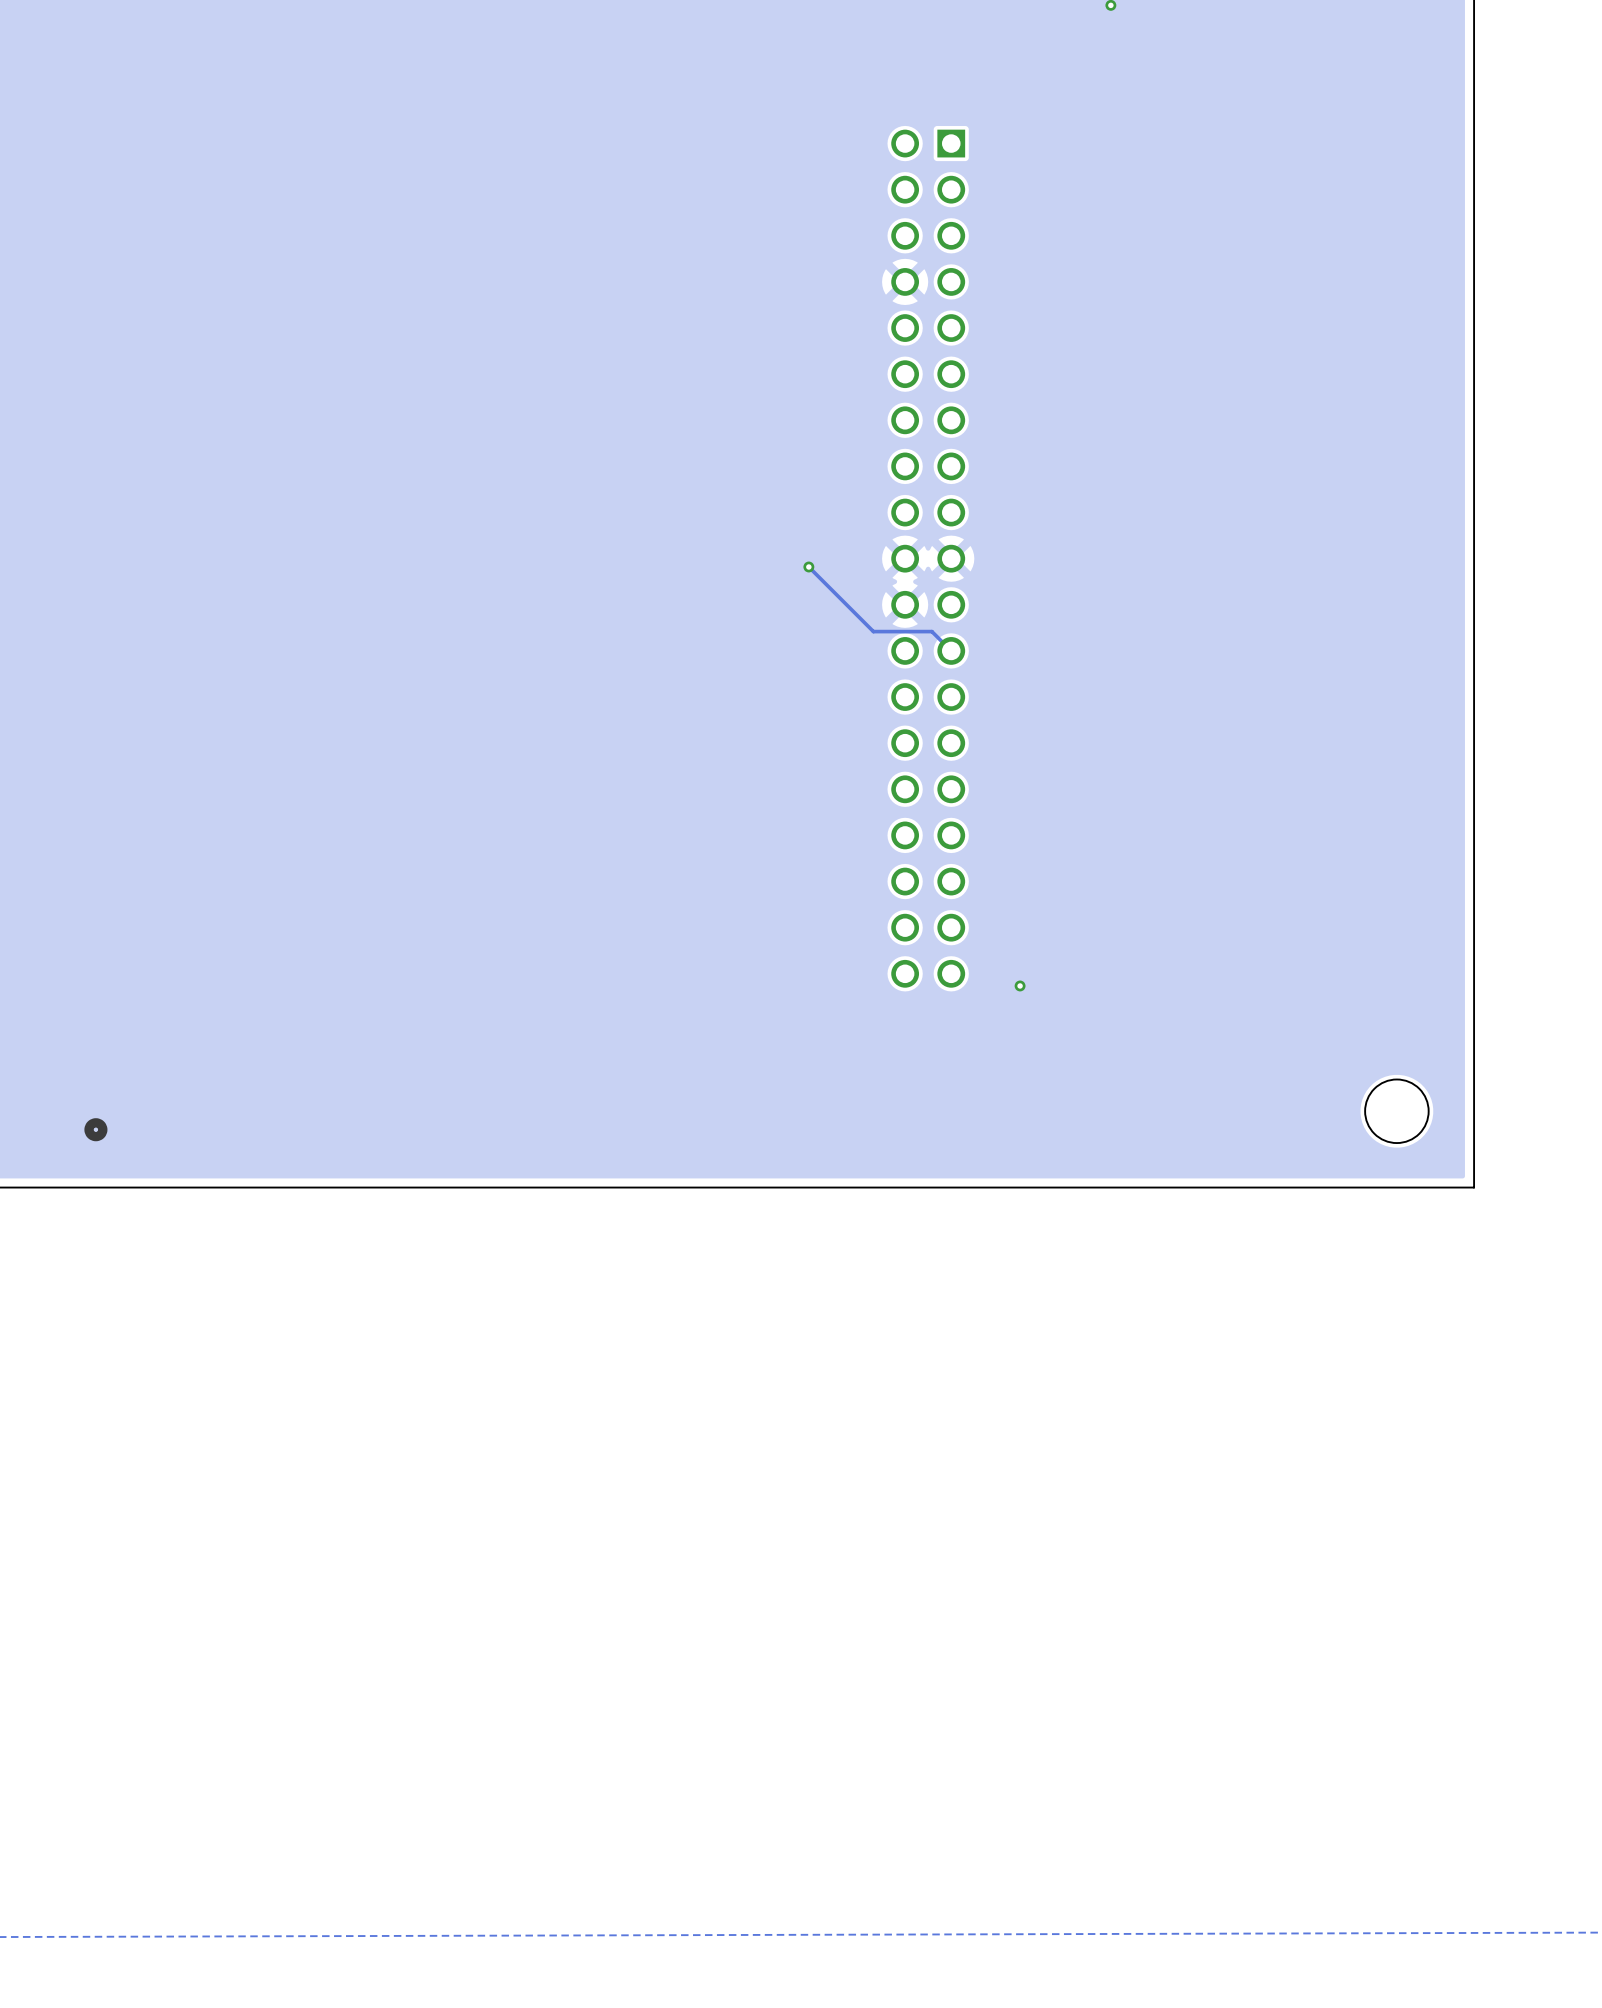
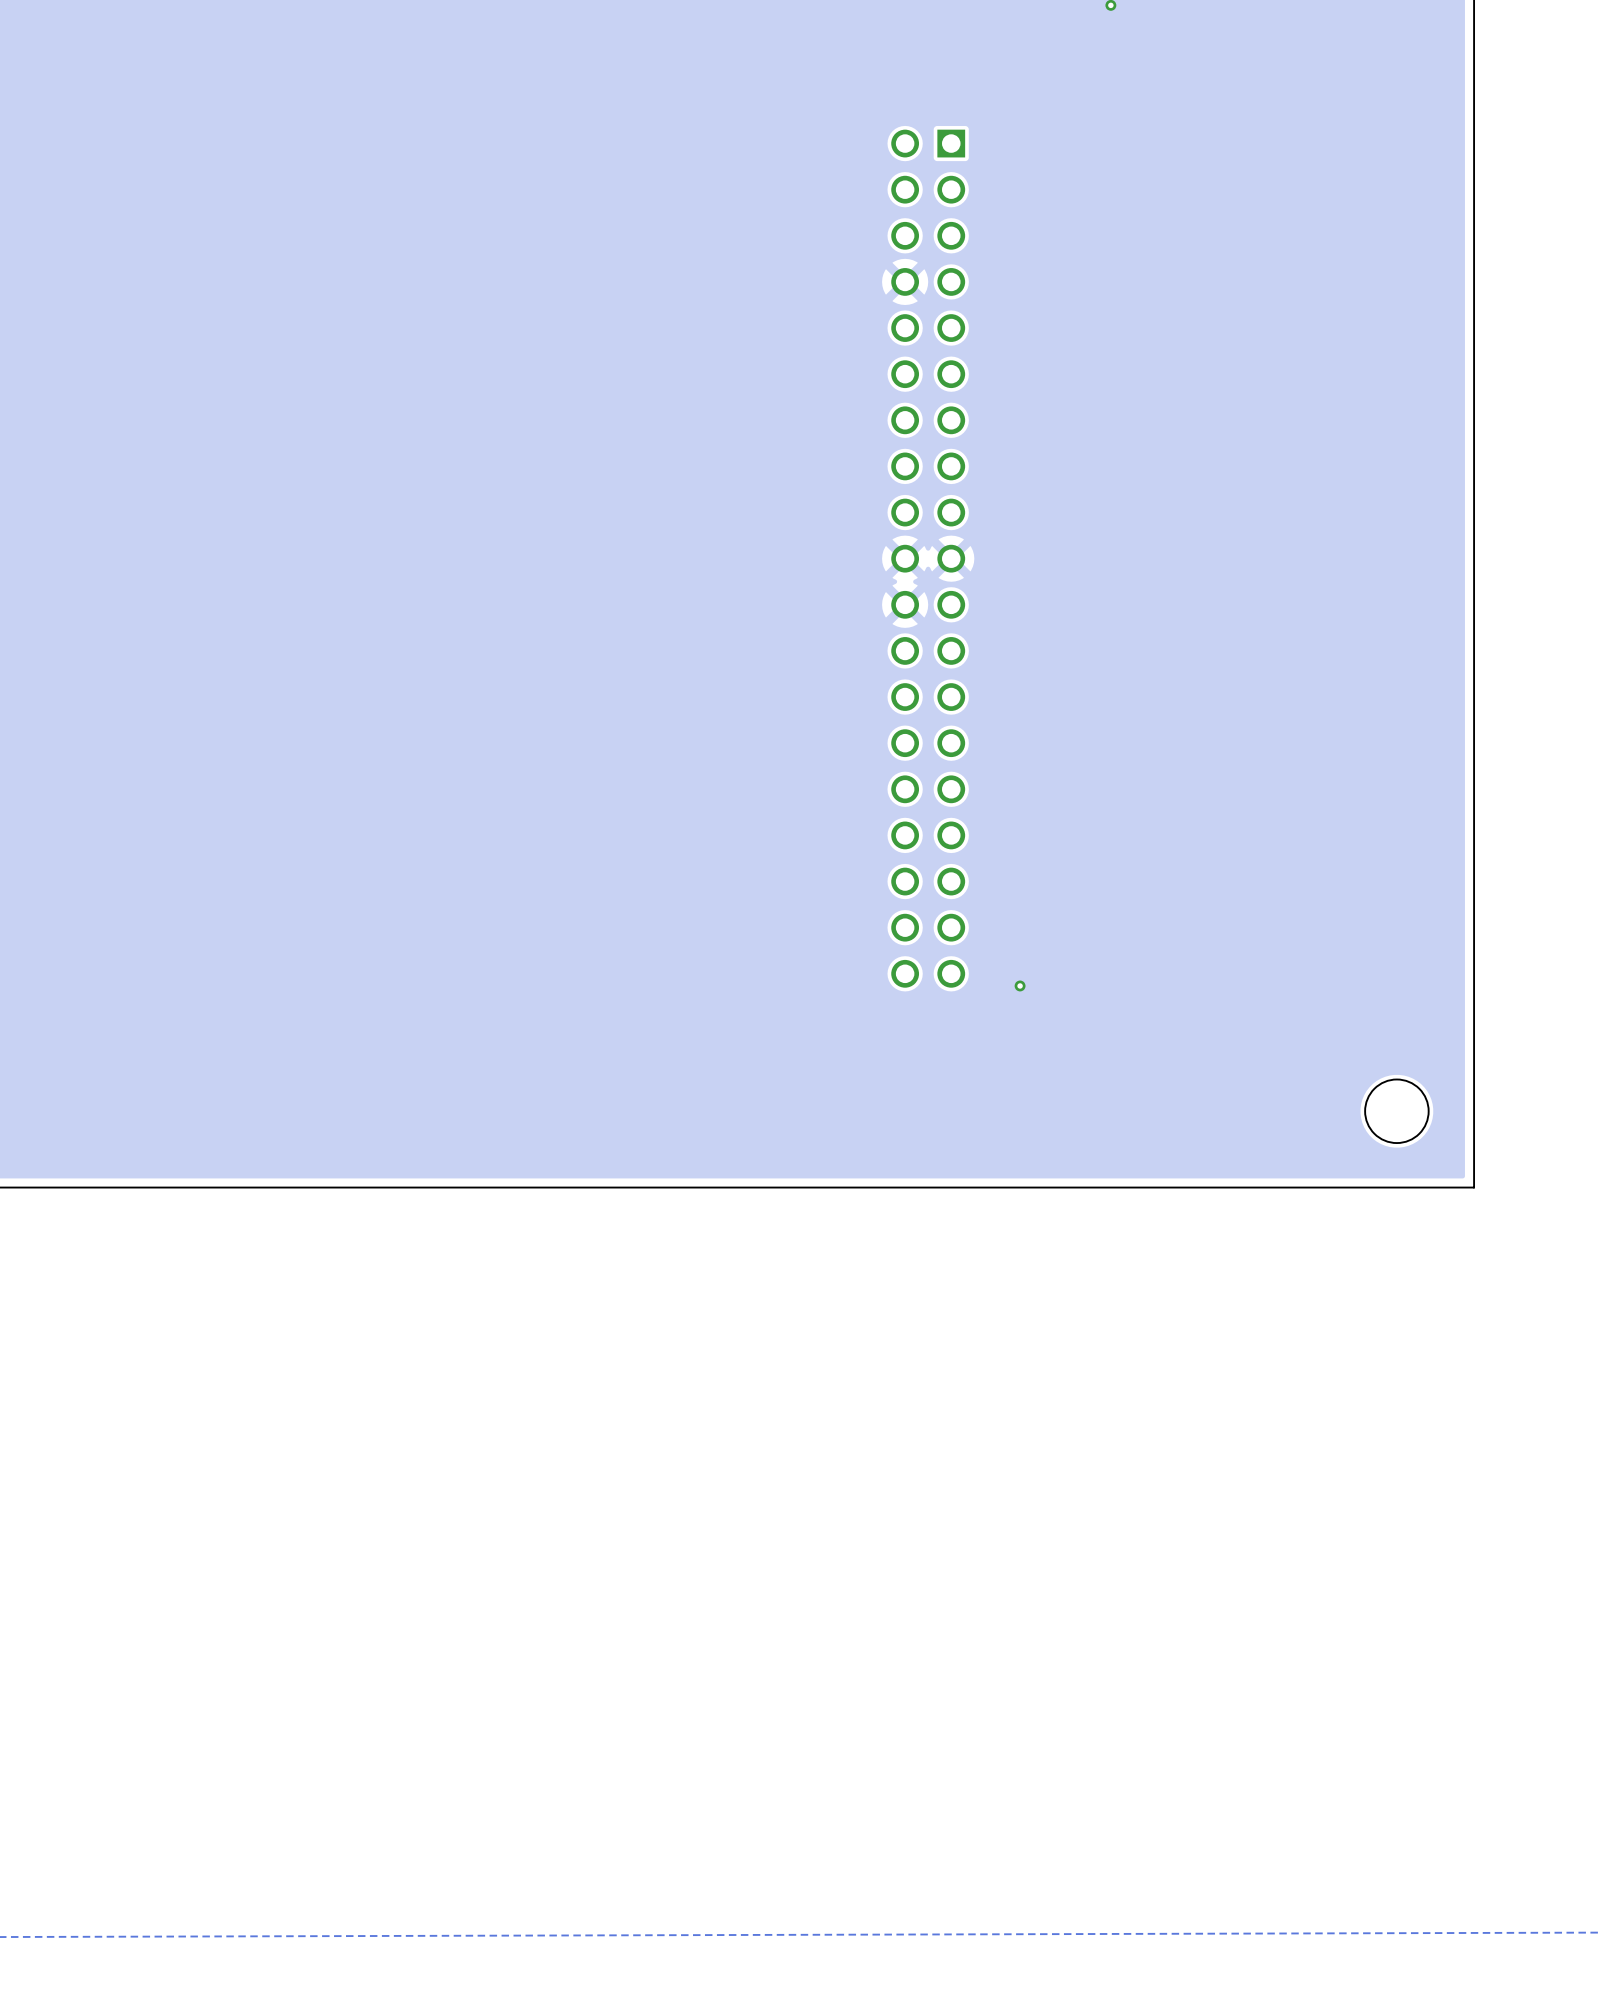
track: (808, 566) (873, 631) (931, 631) (951, 650) -> none
via: (808, 566) -> none
part: (95, 1129) -> none

